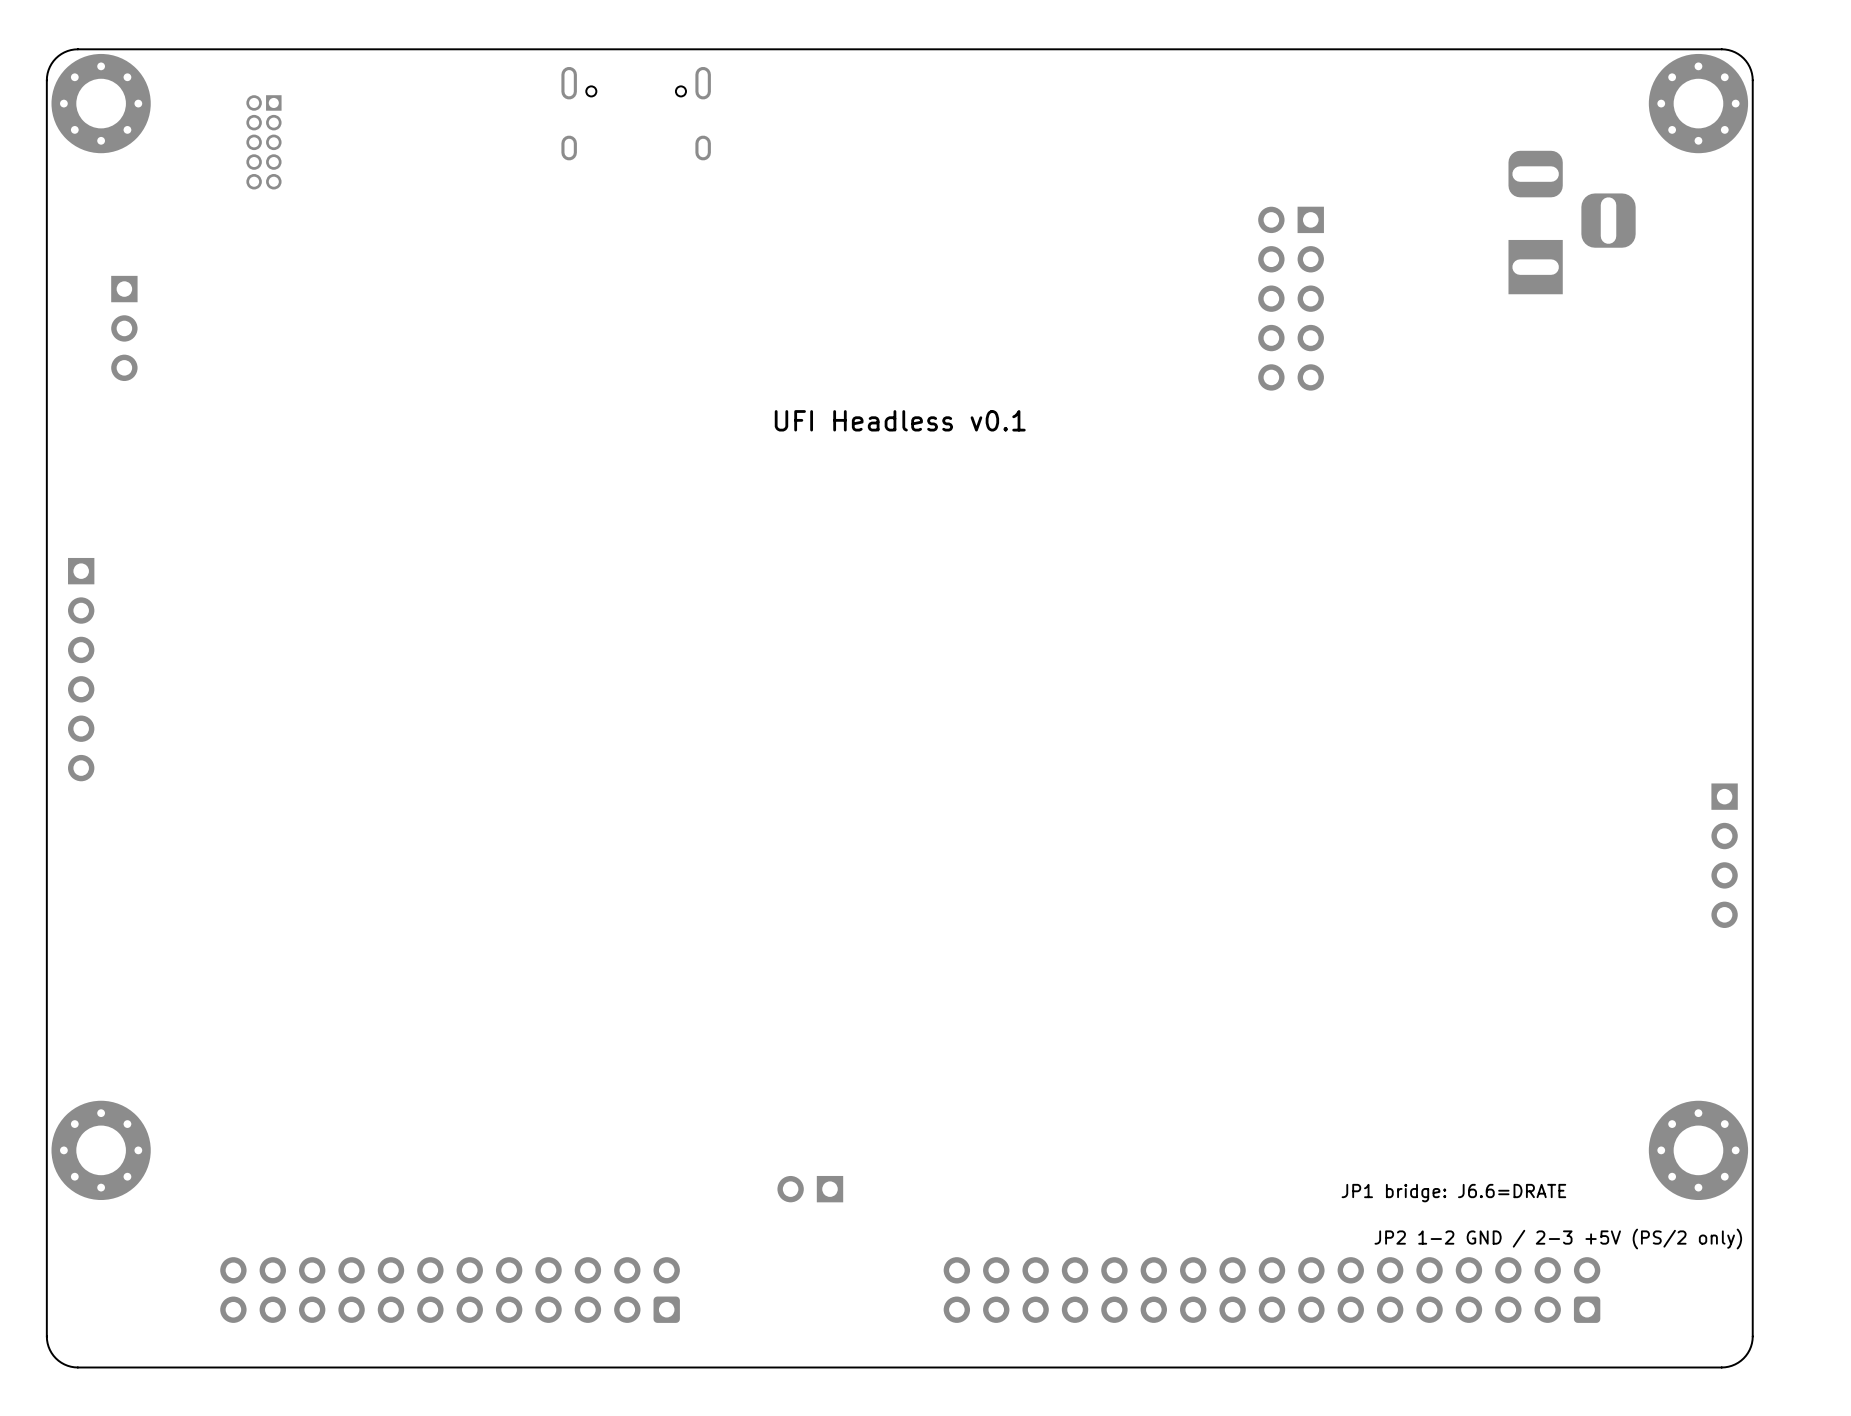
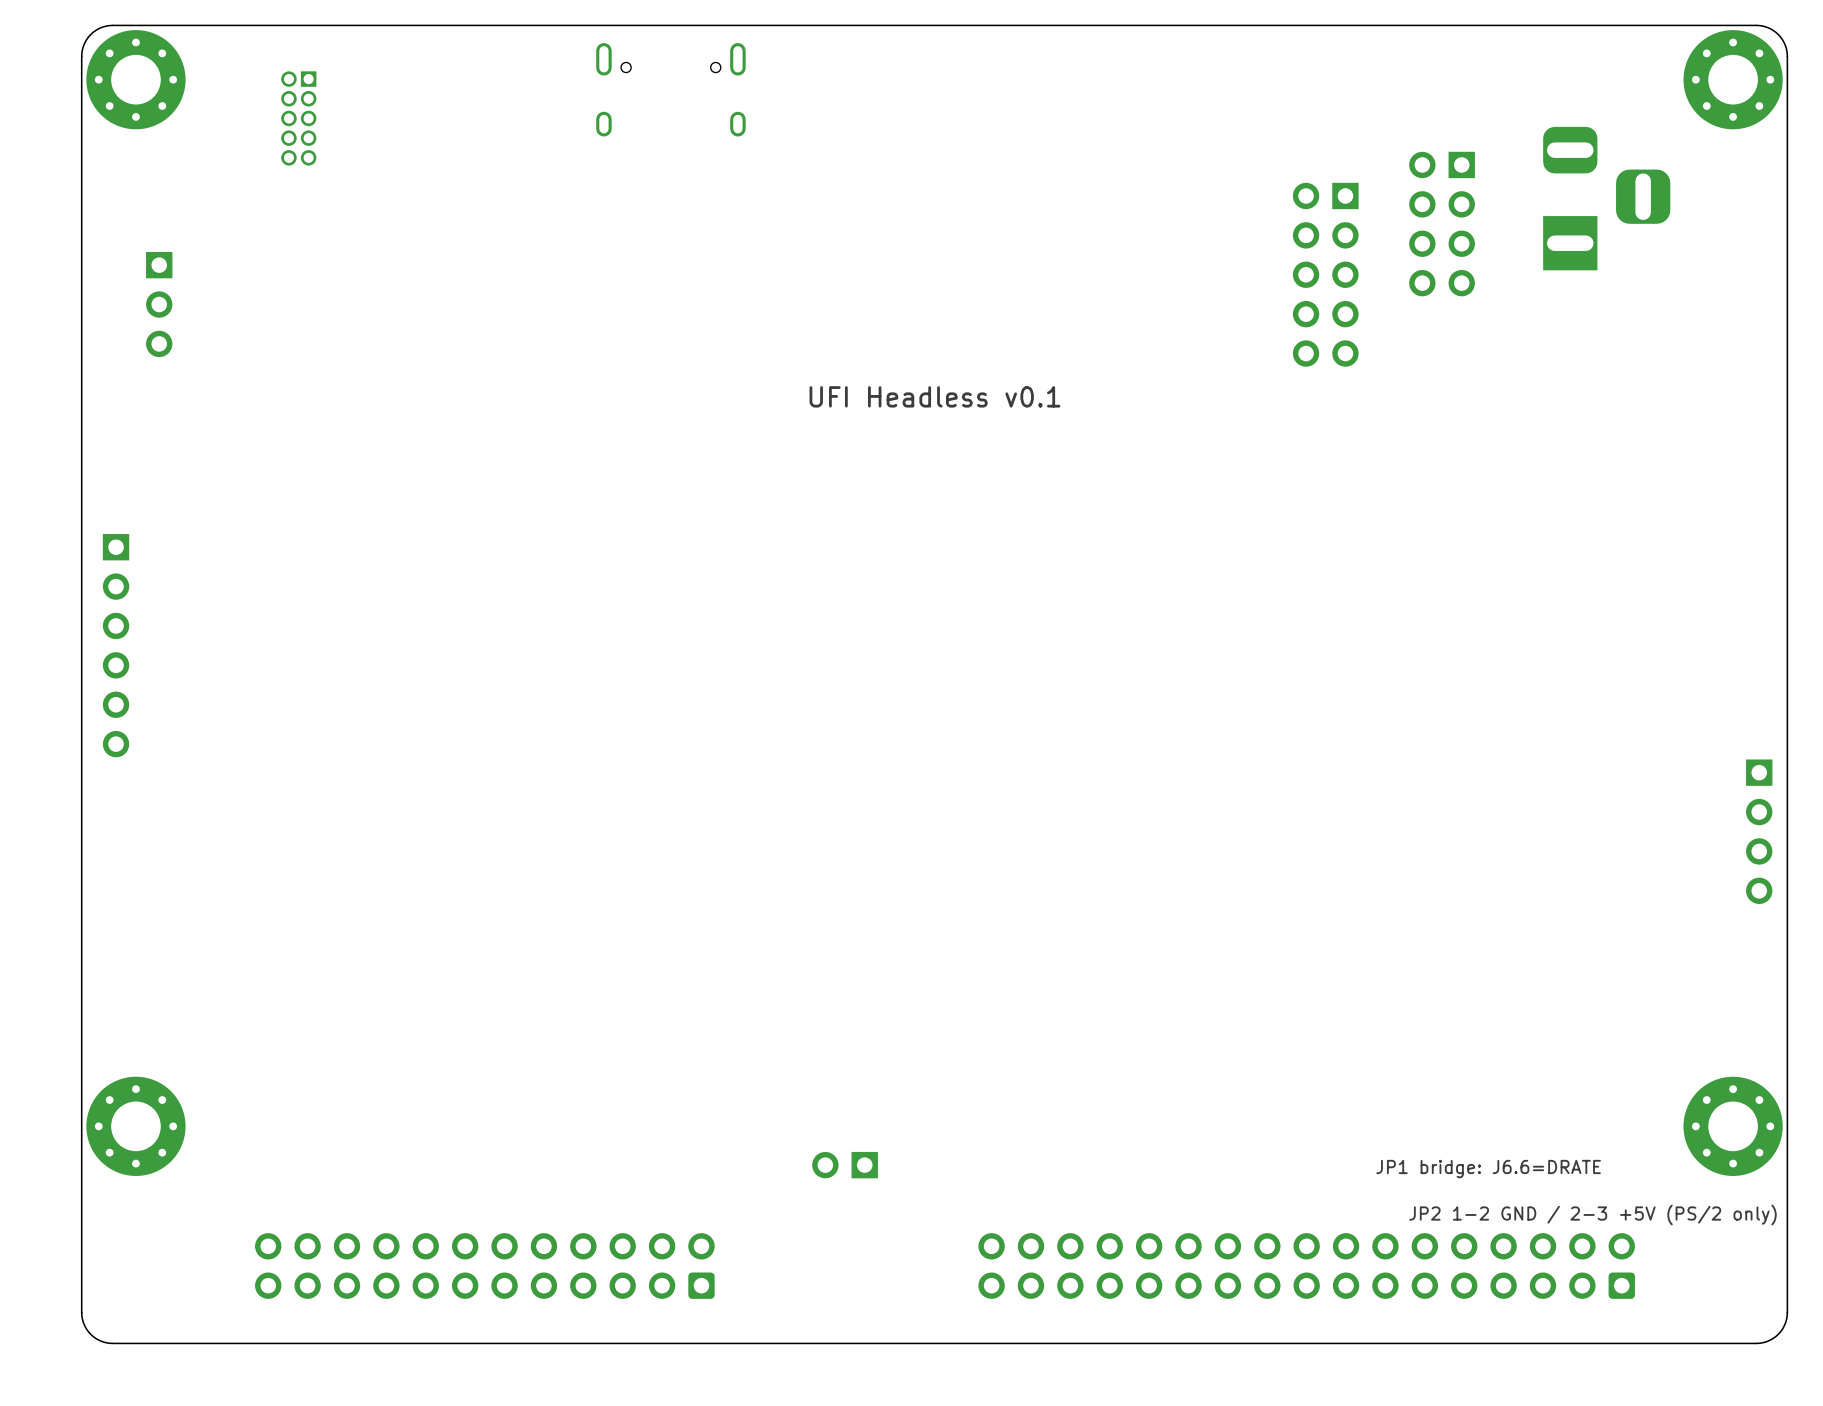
part: none -> (1442, 224)

